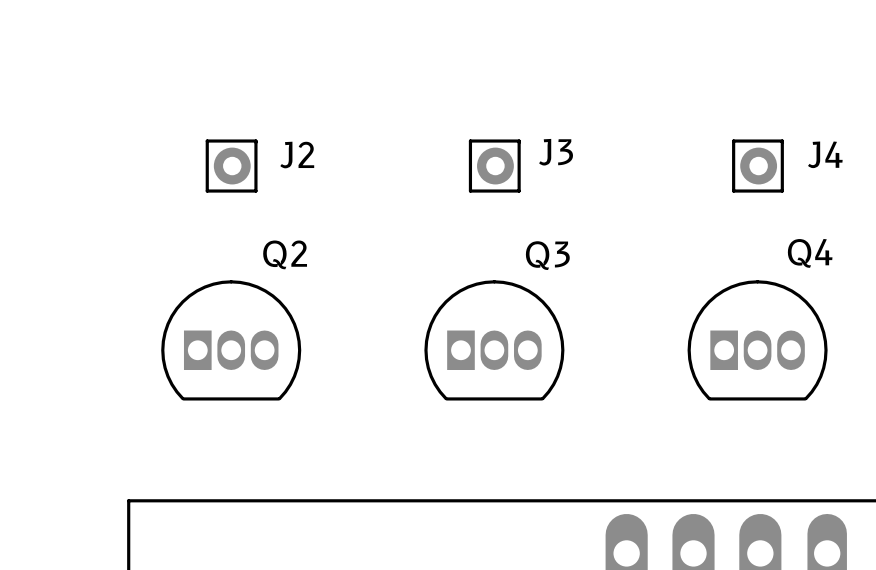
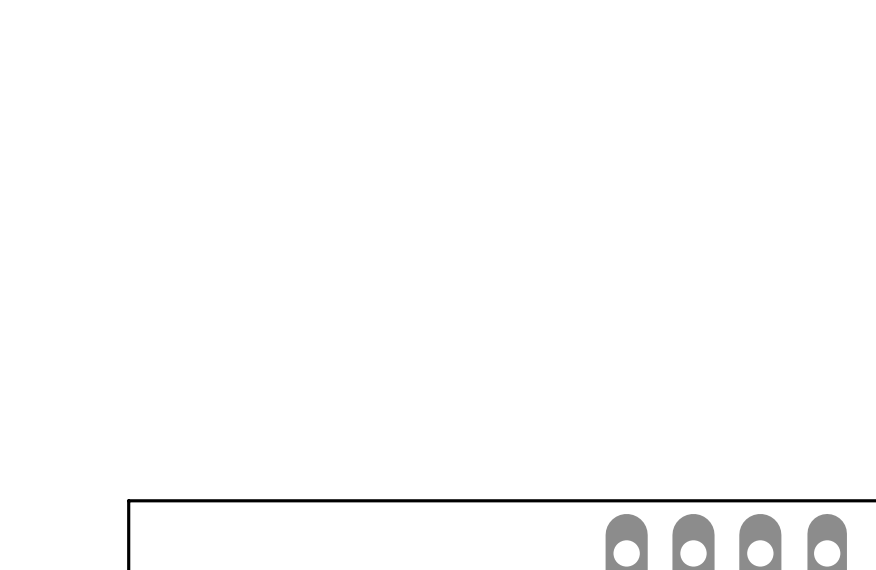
J2: (231, 166) -> none
J3: (494, 166) -> none
J4: (757, 166) -> none
Q2: (231, 340) -> none
Q3: (494, 340) -> none
Q4: (757, 340) -> none

